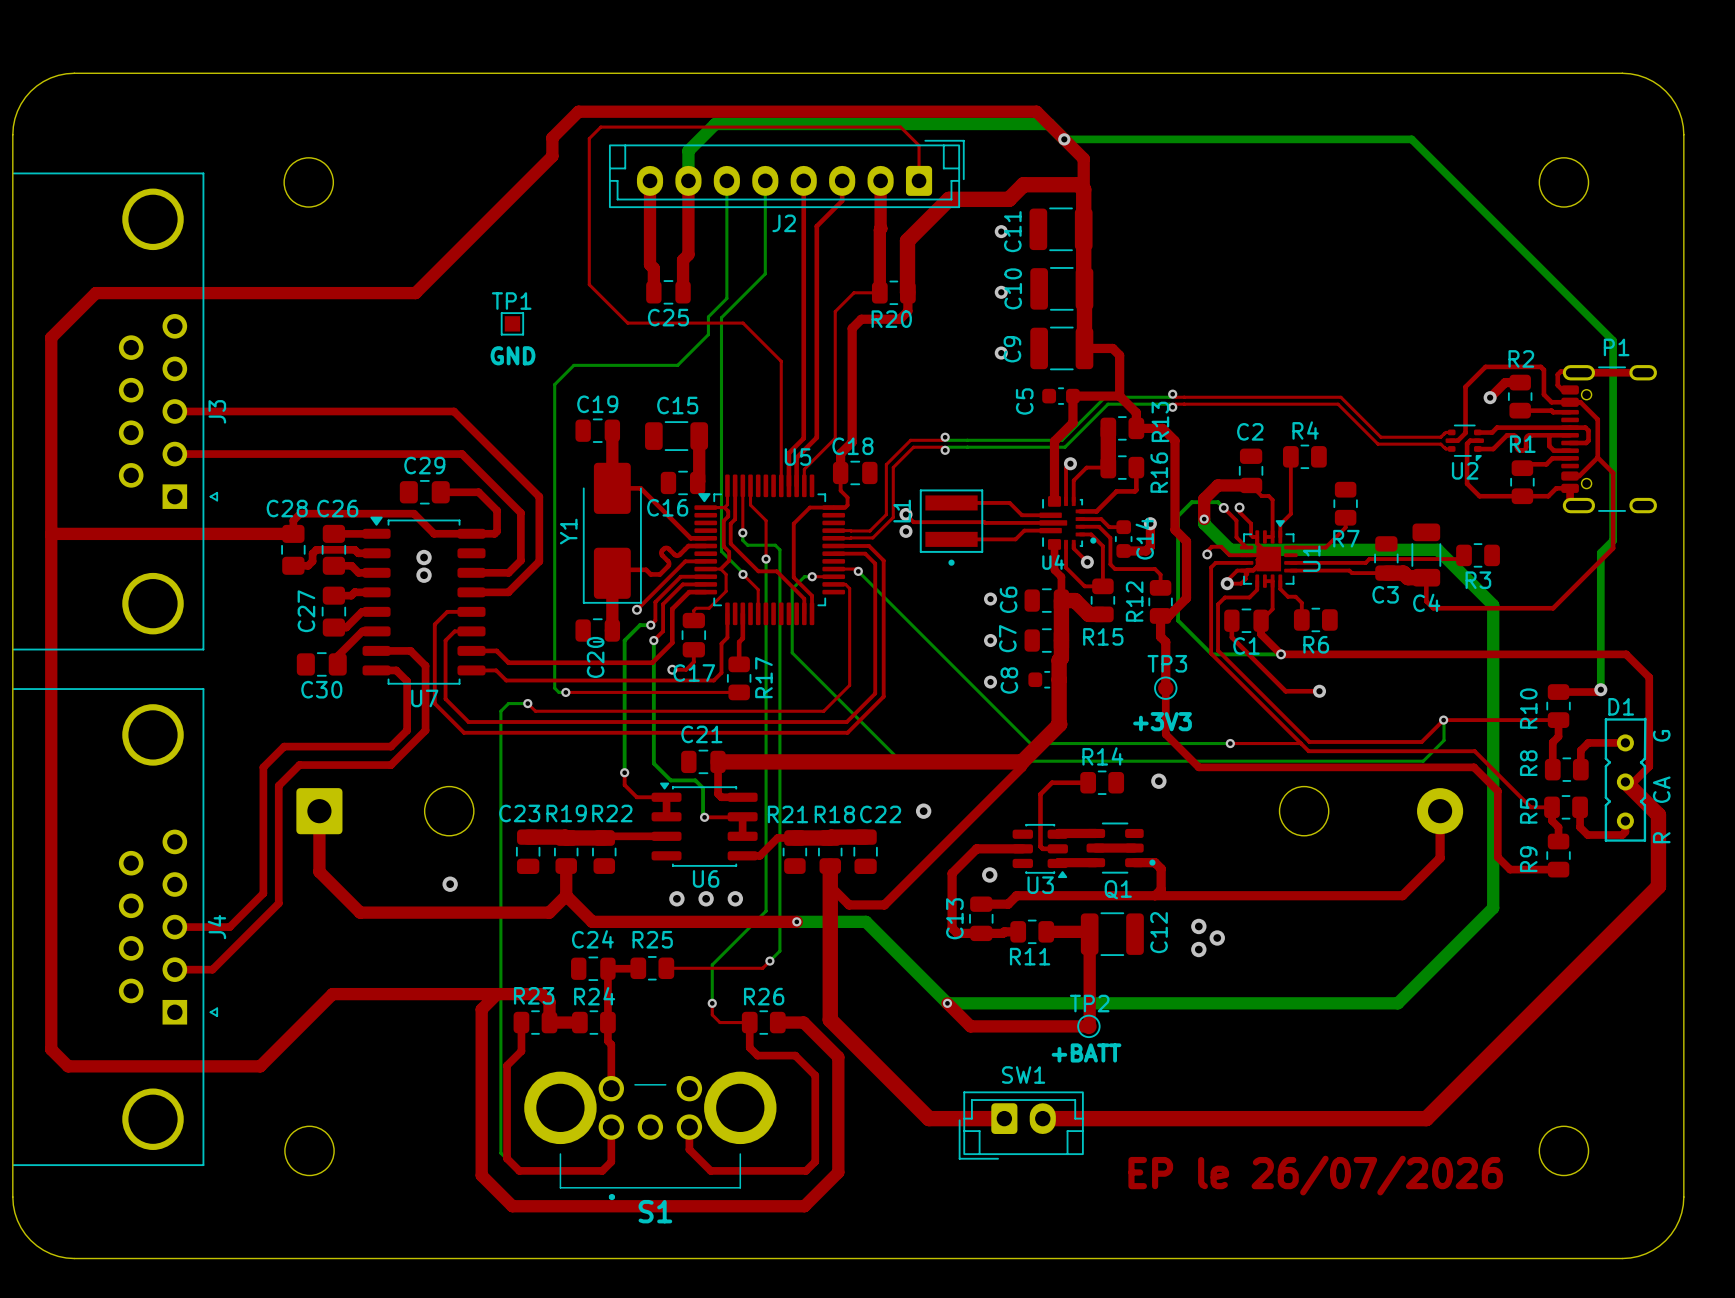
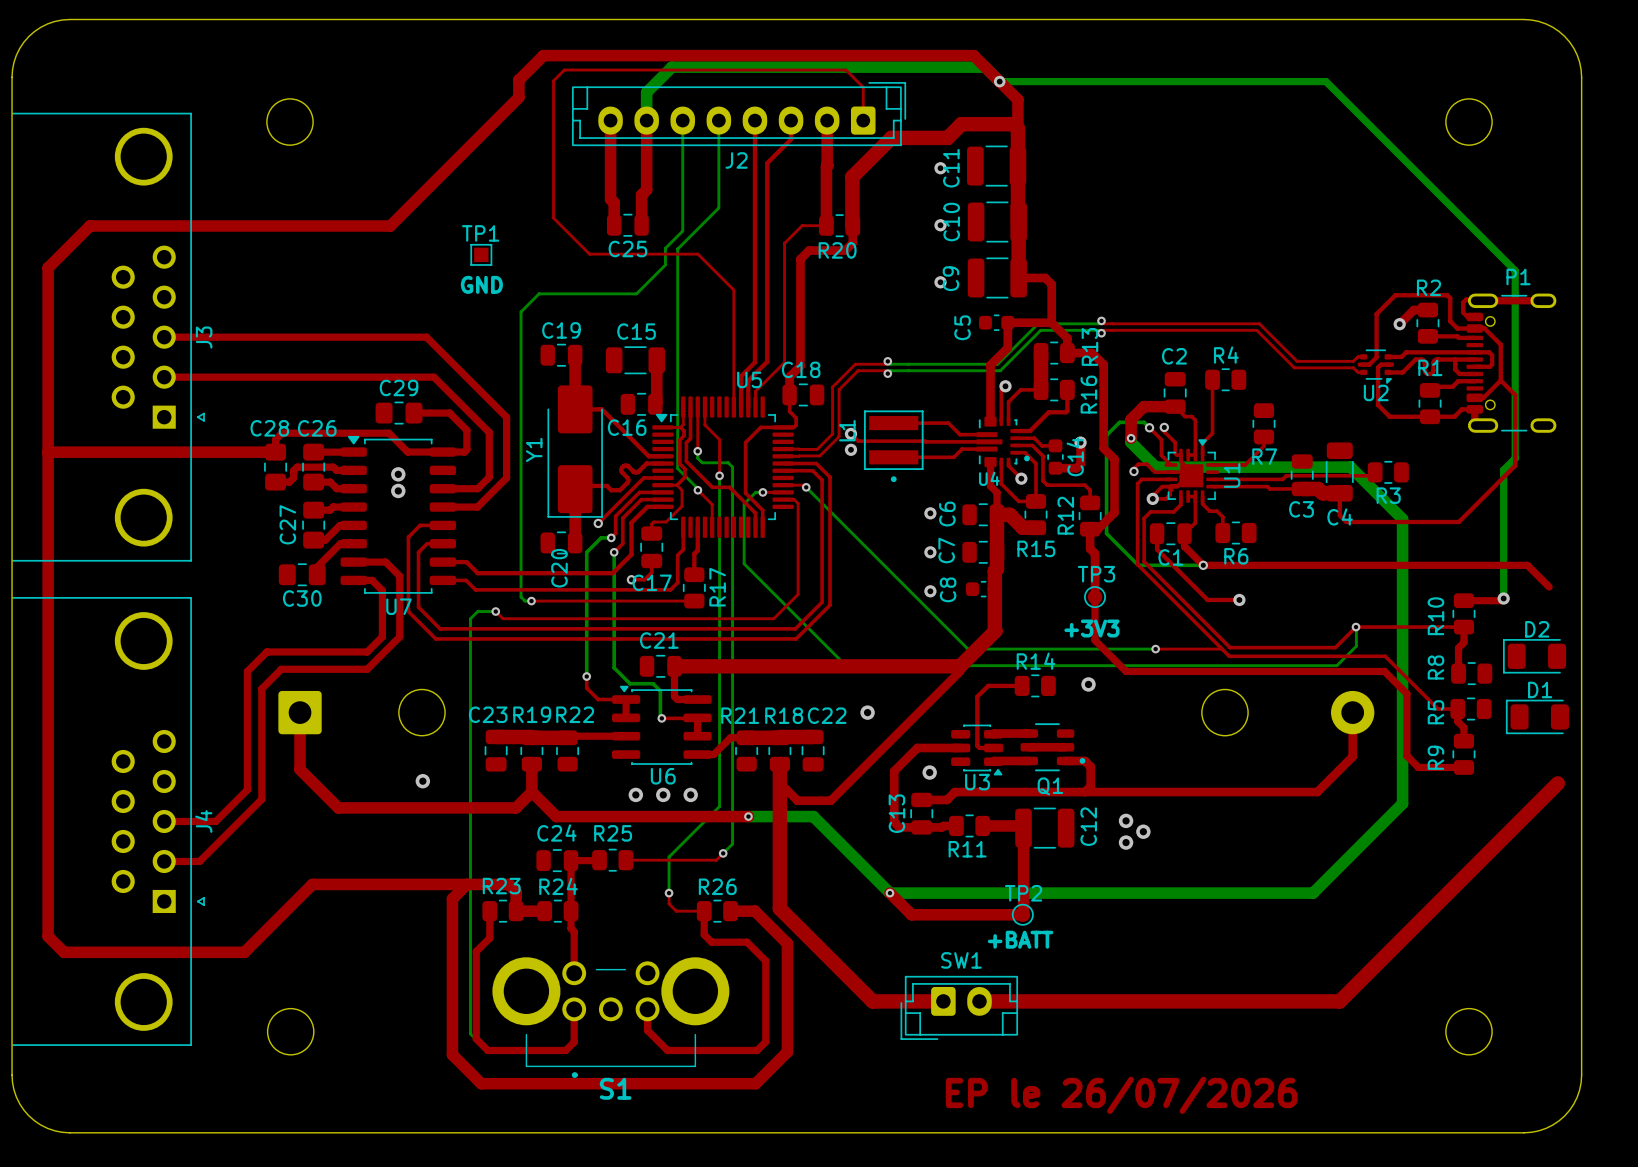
top track: (1649, 677) (1649, 766) (1633, 781) (1625, 781) (1658, 815) (1658, 886) -> none
D1 name position: D1 (1621, 706) -> D1 (1540, 689)
D1 footprint: [1604, 717, 1647, 842] -> [1505, 699, 1569, 735]
top track: (1625, 742) (1588, 742) (1580, 750) (1580, 769) -> none
D2: none -> (1534, 656)
top track: (1580, 807) (1580, 827) (1587, 835) (1622, 835) (1625, 831) (1625, 821) -> none
text position: EP le 26/07/2026 (1315, 1175) -> EP le 26/07/2026 (1121, 1095)

